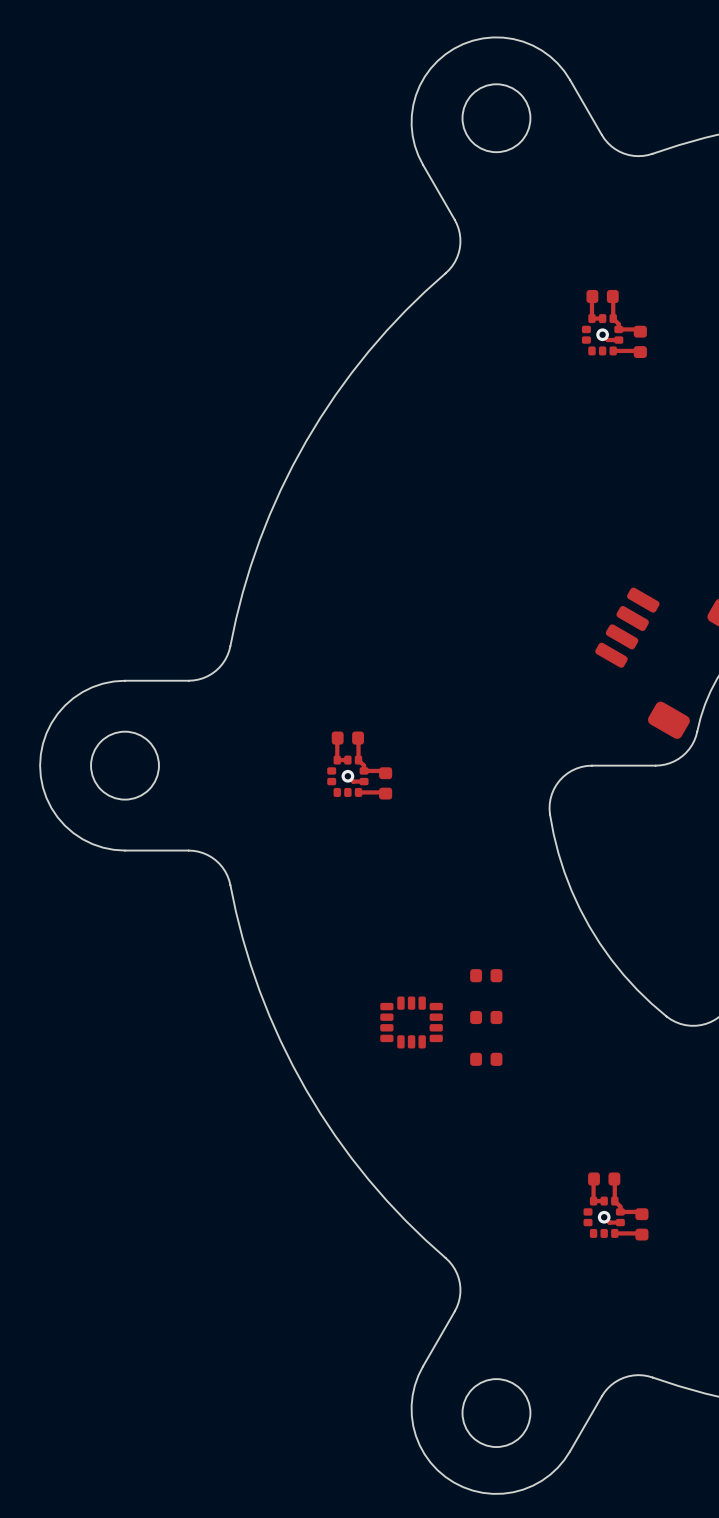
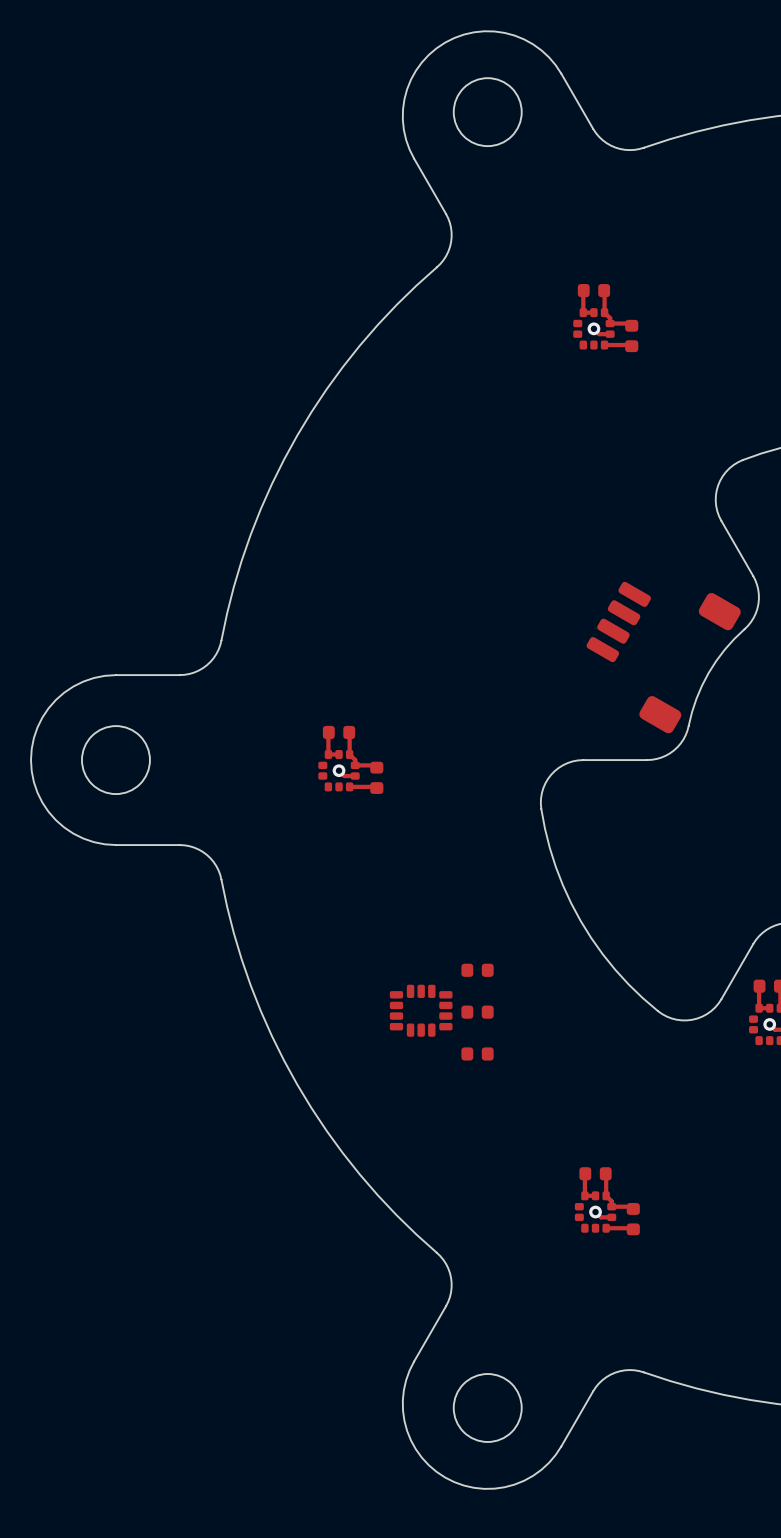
part position: (411, 1022) -> (421, 1010)

